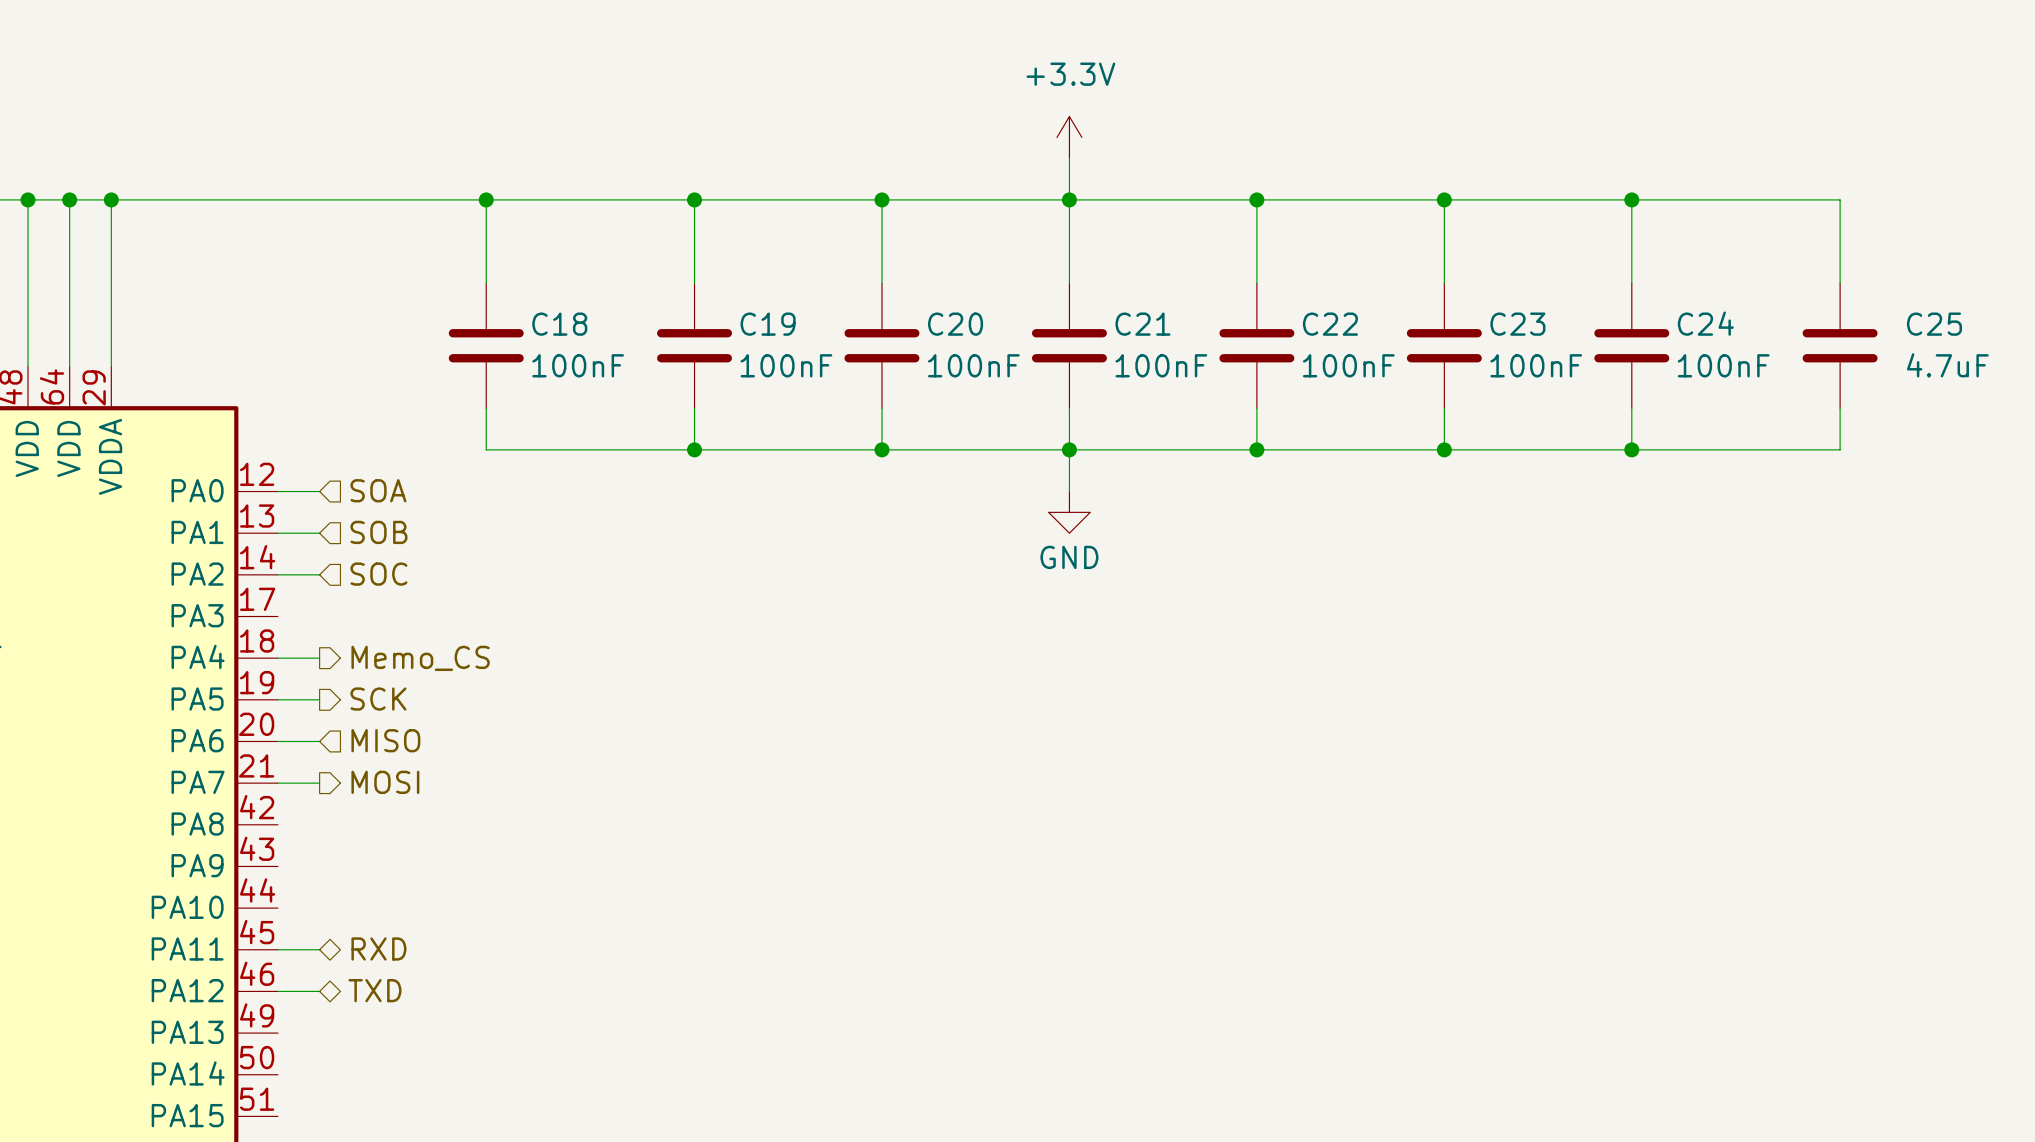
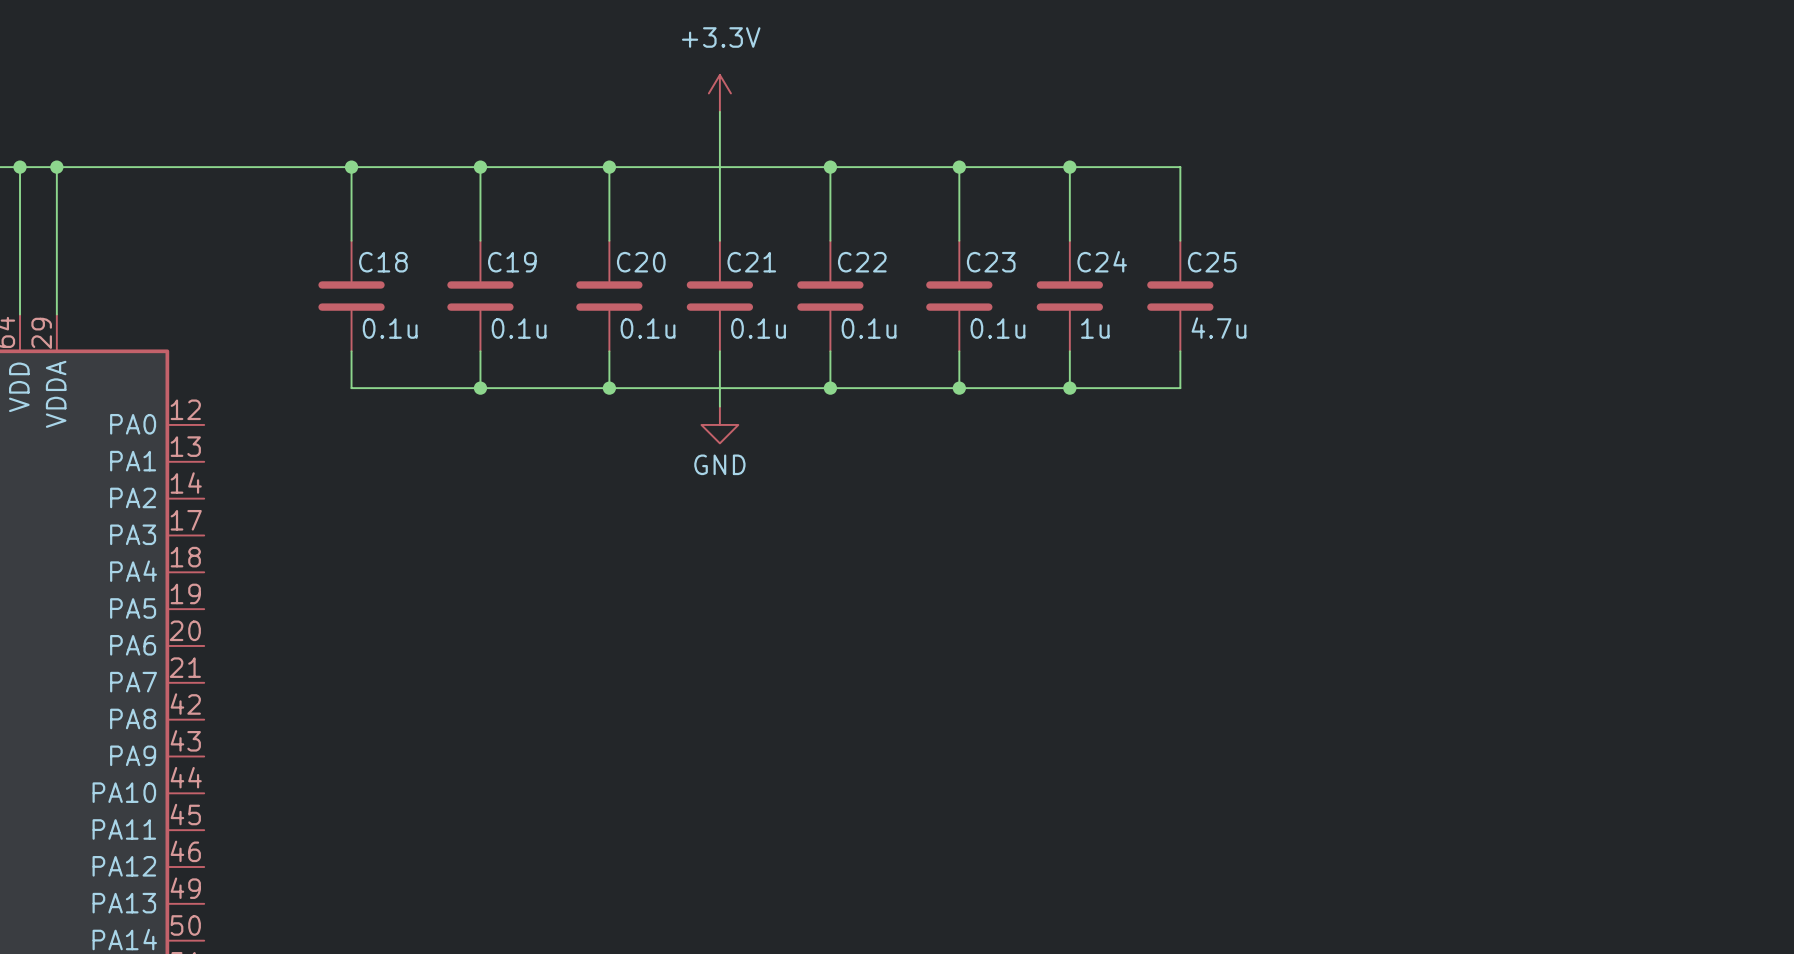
wire: none -> (719, 111) (719, 240)
power symbol position: +3.3V (1069, 137) -> +3.3V (719, 93)
wire: (1069, 158) (1069, 283) -> none
wire: (486, 199) (486, 283) -> (480, 167) (480, 240)
junction position: (486, 199) -> (351, 167)
junction: none -> (480, 167)
wire: (694, 199) (694, 283) -> (351, 167) (351, 240)
junction position: (694, 199) -> (609, 167)
wire: (881, 199) (881, 283) -> (830, 167) (830, 240)
junction: (881, 199) -> none
junction: none -> (830, 167)
junction: (1069, 199) -> none
junction: none -> (959, 167)
wire: (1381, 199) (1840, 199) (1840, 283) -> (1180, 167) (1180, 240)
wire: (1444, 199) (1444, 283) -> (959, 167) (959, 240)
junction: (1444, 199) -> none
wire: (1631, 199) (1631, 283) -> none
junction: (1631, 199) -> none
C18 name position: C18 (559, 324) -> C18 (383, 262)
C19 name position: C19 (768, 324) -> C19 (512, 262)
C20 name position: C20 (955, 324) -> C20 (641, 262)
C21 name position: C21 (1142, 324) -> C21 (751, 262)
C22 name: C22 (1330, 324) -> C24 (1102, 261)
C23 name position: C23 (1517, 324) -> C23 (991, 262)
C25 name position: C25 (1934, 324) -> C25 (1212, 262)
C18 position: (486, 345) -> (351, 296)
C19 position: (694, 345) -> (480, 296)
C20 position: (881, 345) -> (609, 296)
C22: none -> 0.1u (830, 296)
C21 position: (1069, 345) -> (719, 296)
C23 position: (1444, 345) -> (959, 296)
C24: 100nF (1631, 345) -> none
C25 position: (1840, 345) -> (1180, 296)
C18 value: 100nF (578, 365) -> 0.1u (390, 328)
C19 value: 100nF (786, 365) -> 0.1u (519, 328)
C20 value: 100nF (973, 365) -> 0.1u (648, 328)
C21 value: 100nF (1161, 365) -> 0.1u (758, 328)
C22 value: 100nF (1348, 365) -> 1u (1095, 328)
C23 value: 100nF (1536, 365) -> 0.1u (997, 328)
C25 value: 4.7uF (1947, 365) -> 4.7u (1218, 328)
wire: (486, 408) (486, 449) -> (351, 351) (351, 388) (388, 388)
wire: none -> (480, 351) (480, 388)
wire: (694, 408) (694, 449) -> (609, 351) (609, 388)
wire: none -> (719, 351) (719, 406)
wire: (881, 408) (881, 449) -> (830, 351) (830, 388)
wire: (1069, 408) (1069, 491) -> (609, 167) (609, 240)
wire: (1444, 408) (1444, 449) -> (959, 351) (959, 388)
wire: (1631, 408) (1631, 449) -> none
wire: (1840, 408) (1840, 449) (1381, 449) -> (1180, 351) (1180, 388)
junction: none -> (480, 388)
junction position: (694, 449) -> (609, 388)
junction: (881, 449) -> none
junction: none -> (830, 388)
junction: (1069, 449) -> none
junction: none -> (959, 388)
junction: (1444, 449) -> none
junction: (1631, 449) -> none
hierarchical label: SOA (378, 490) -> none
wire: (277, 491) (319, 491) -> none
power symbol position: GND (1069, 512) -> GND (719, 424)
hierarchical label: SOB (378, 532) -> none
wire: (277, 533) (319, 533) -> none
wire: (277, 574) (319, 574) -> none
hierarchical label: SOC (378, 574) -> none
wire: (277, 658) (319, 658) -> none
hierarchical label: Memo_CS (420, 658) -> none
wire: (277, 699) (319, 699) -> none
hierarchical label: SCK (378, 699) -> none
hierarchical label: MISO (385, 740) -> none
wire: (277, 741) (319, 741) -> none
hierarchical label: MOSI (385, 782) -> none
wire: (277, 783) (319, 783) -> none
hierarchical label: RXD (378, 948) -> none
wire: (277, 949) (319, 949) -> none
hierarchical label: TXD (374, 990) -> none
wire: (277, 991) (319, 991) -> none

